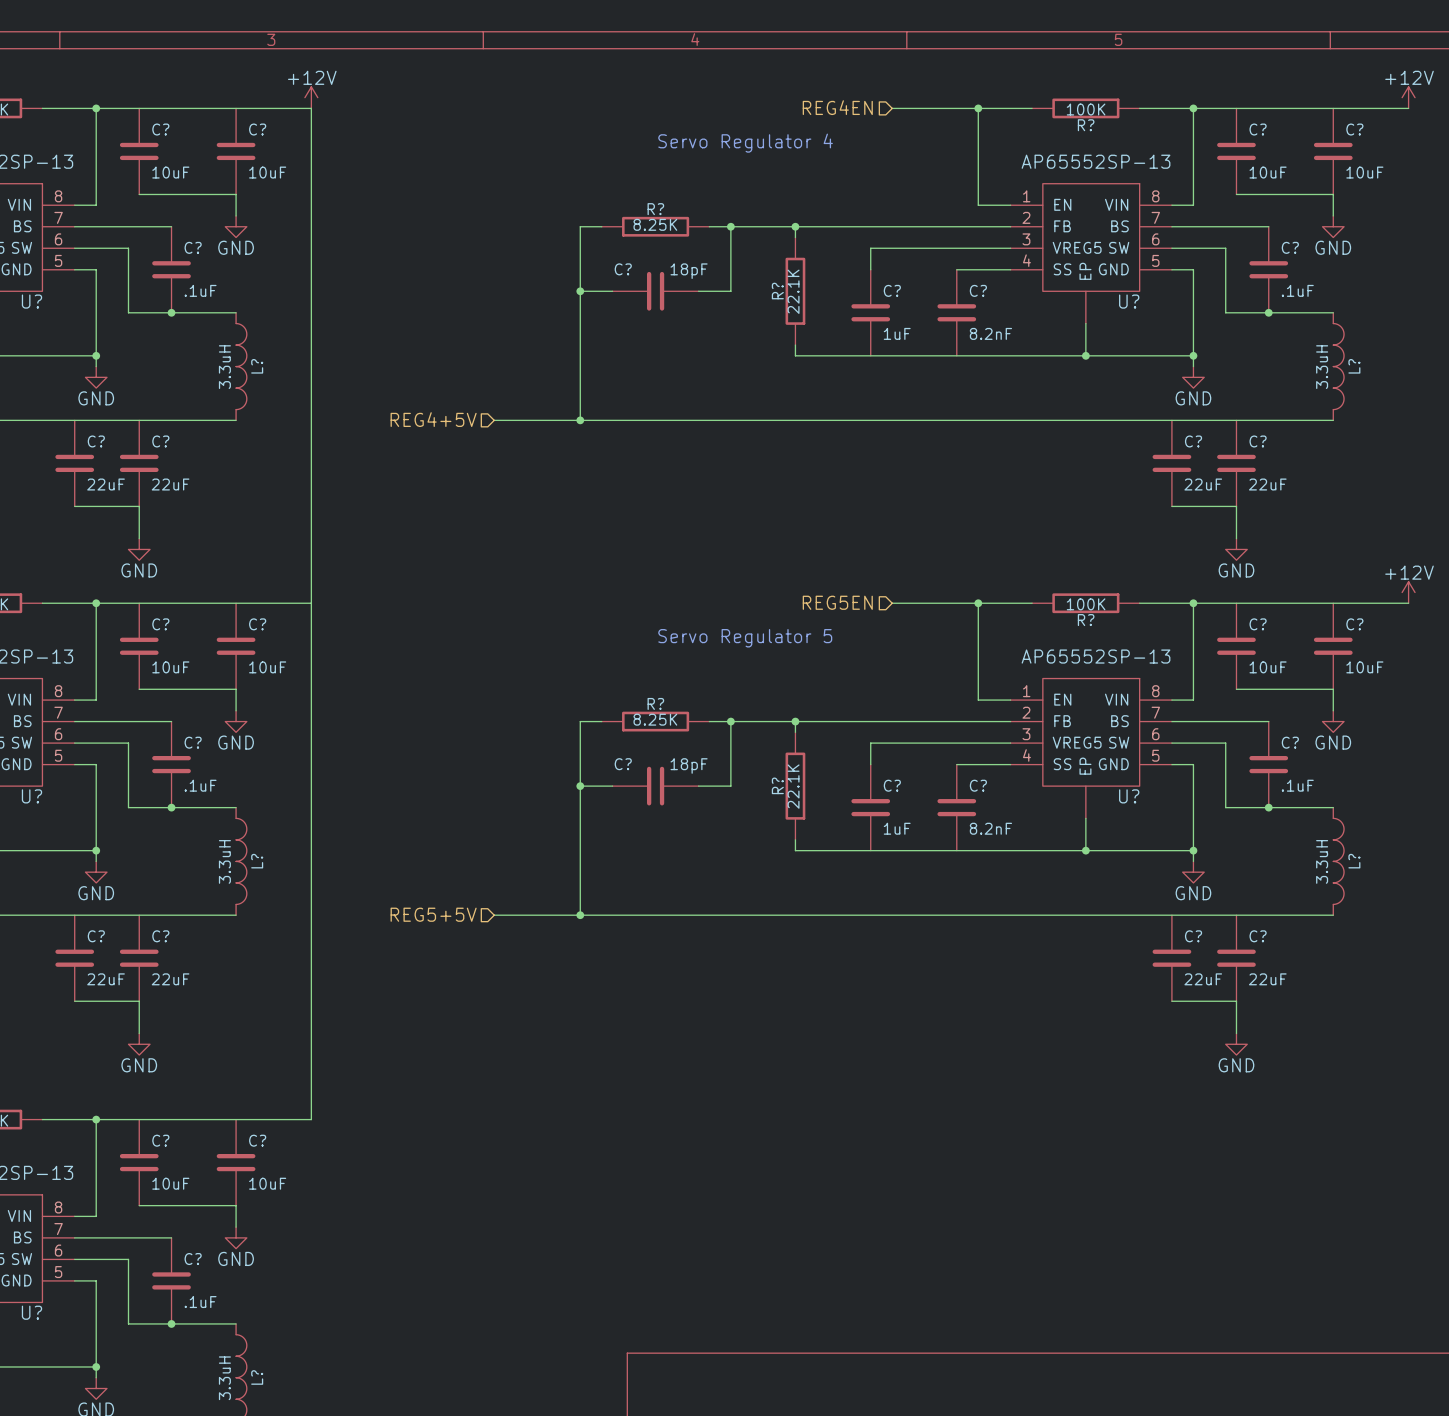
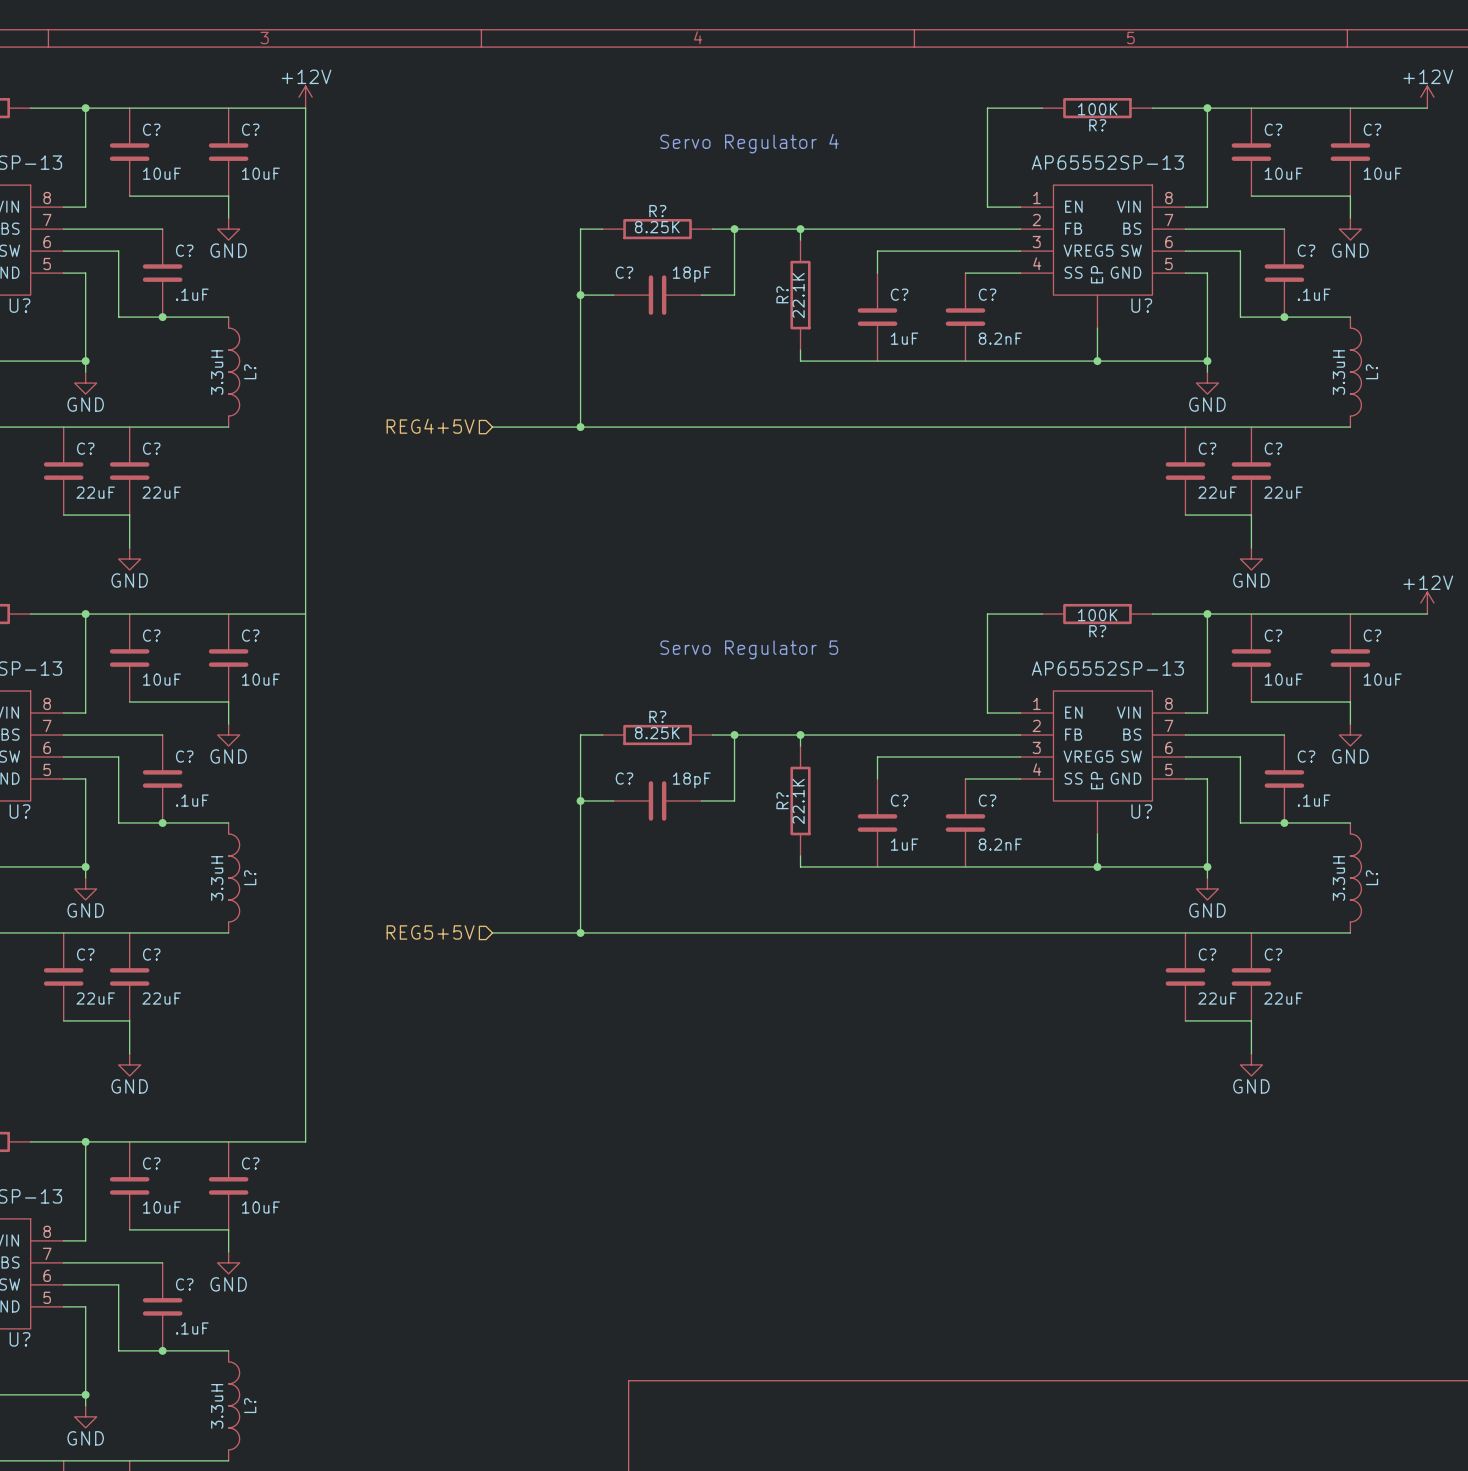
hierarchical label: REG4EN (837, 107) -> none
wire: (892, 108) (978, 108) -> none
junction: (978, 108) -> none
hierarchical label: REG5EN (837, 602) -> none
wire: (892, 603) (978, 603) -> none
junction: (978, 603) -> none

